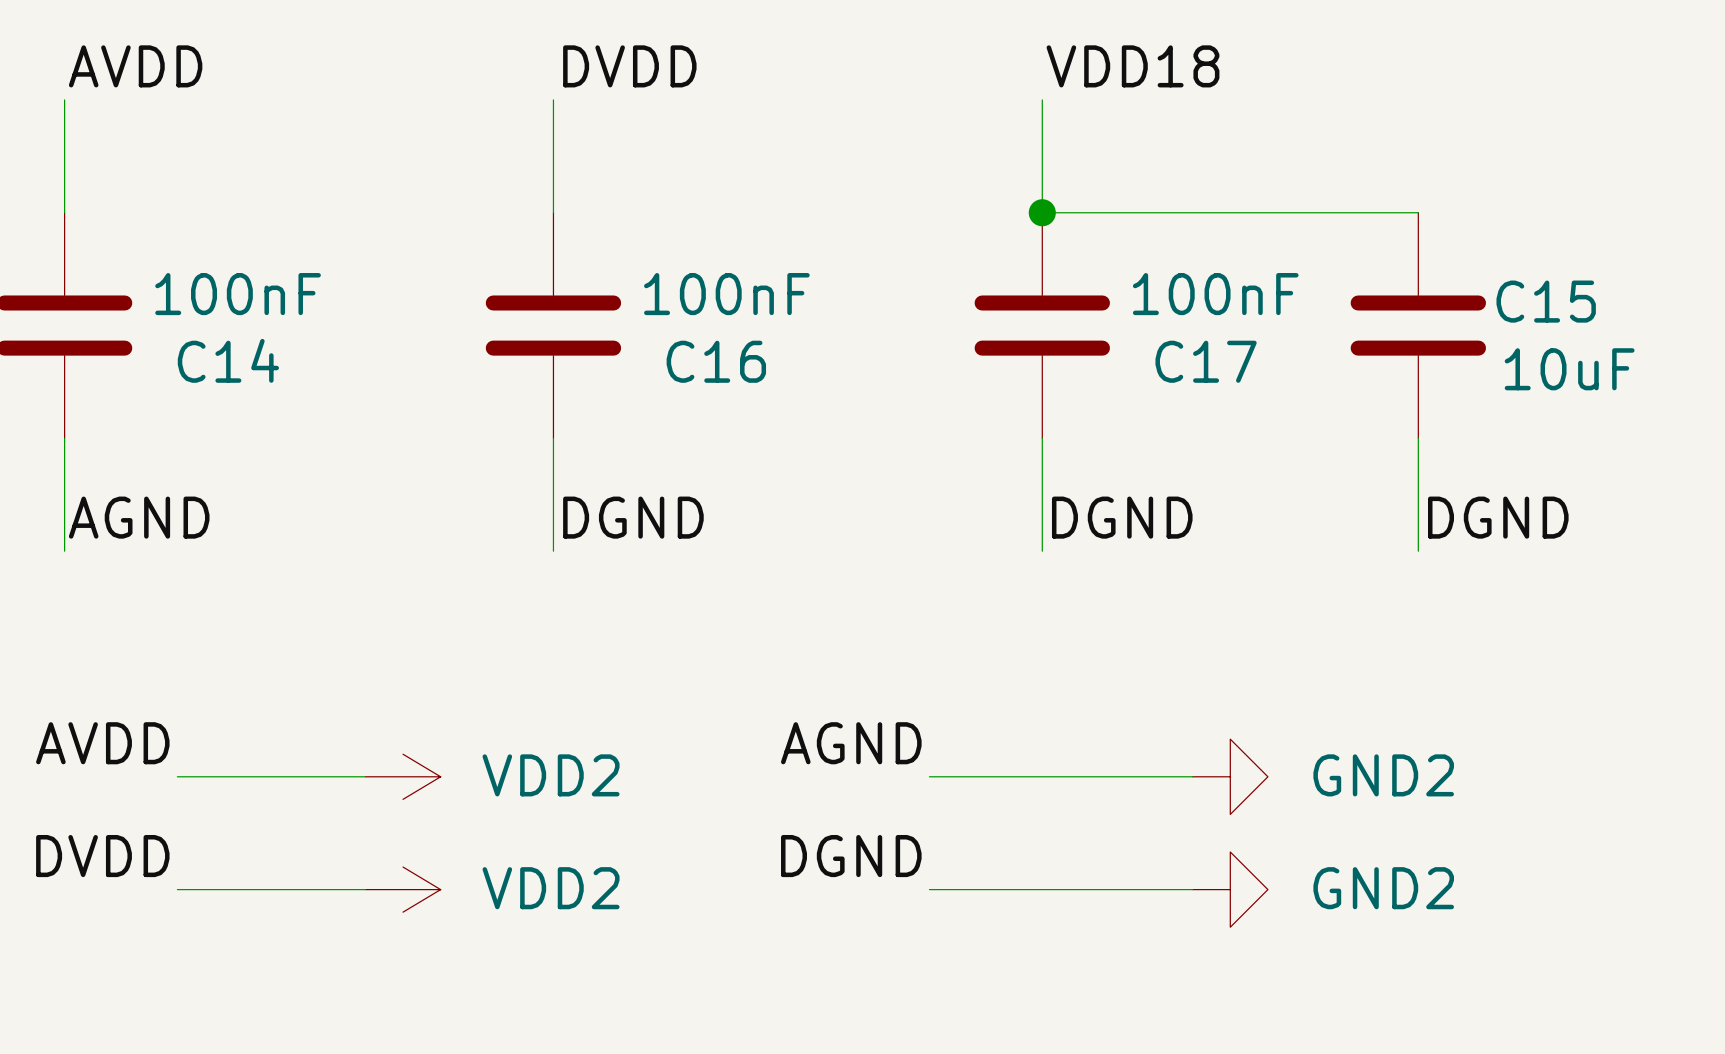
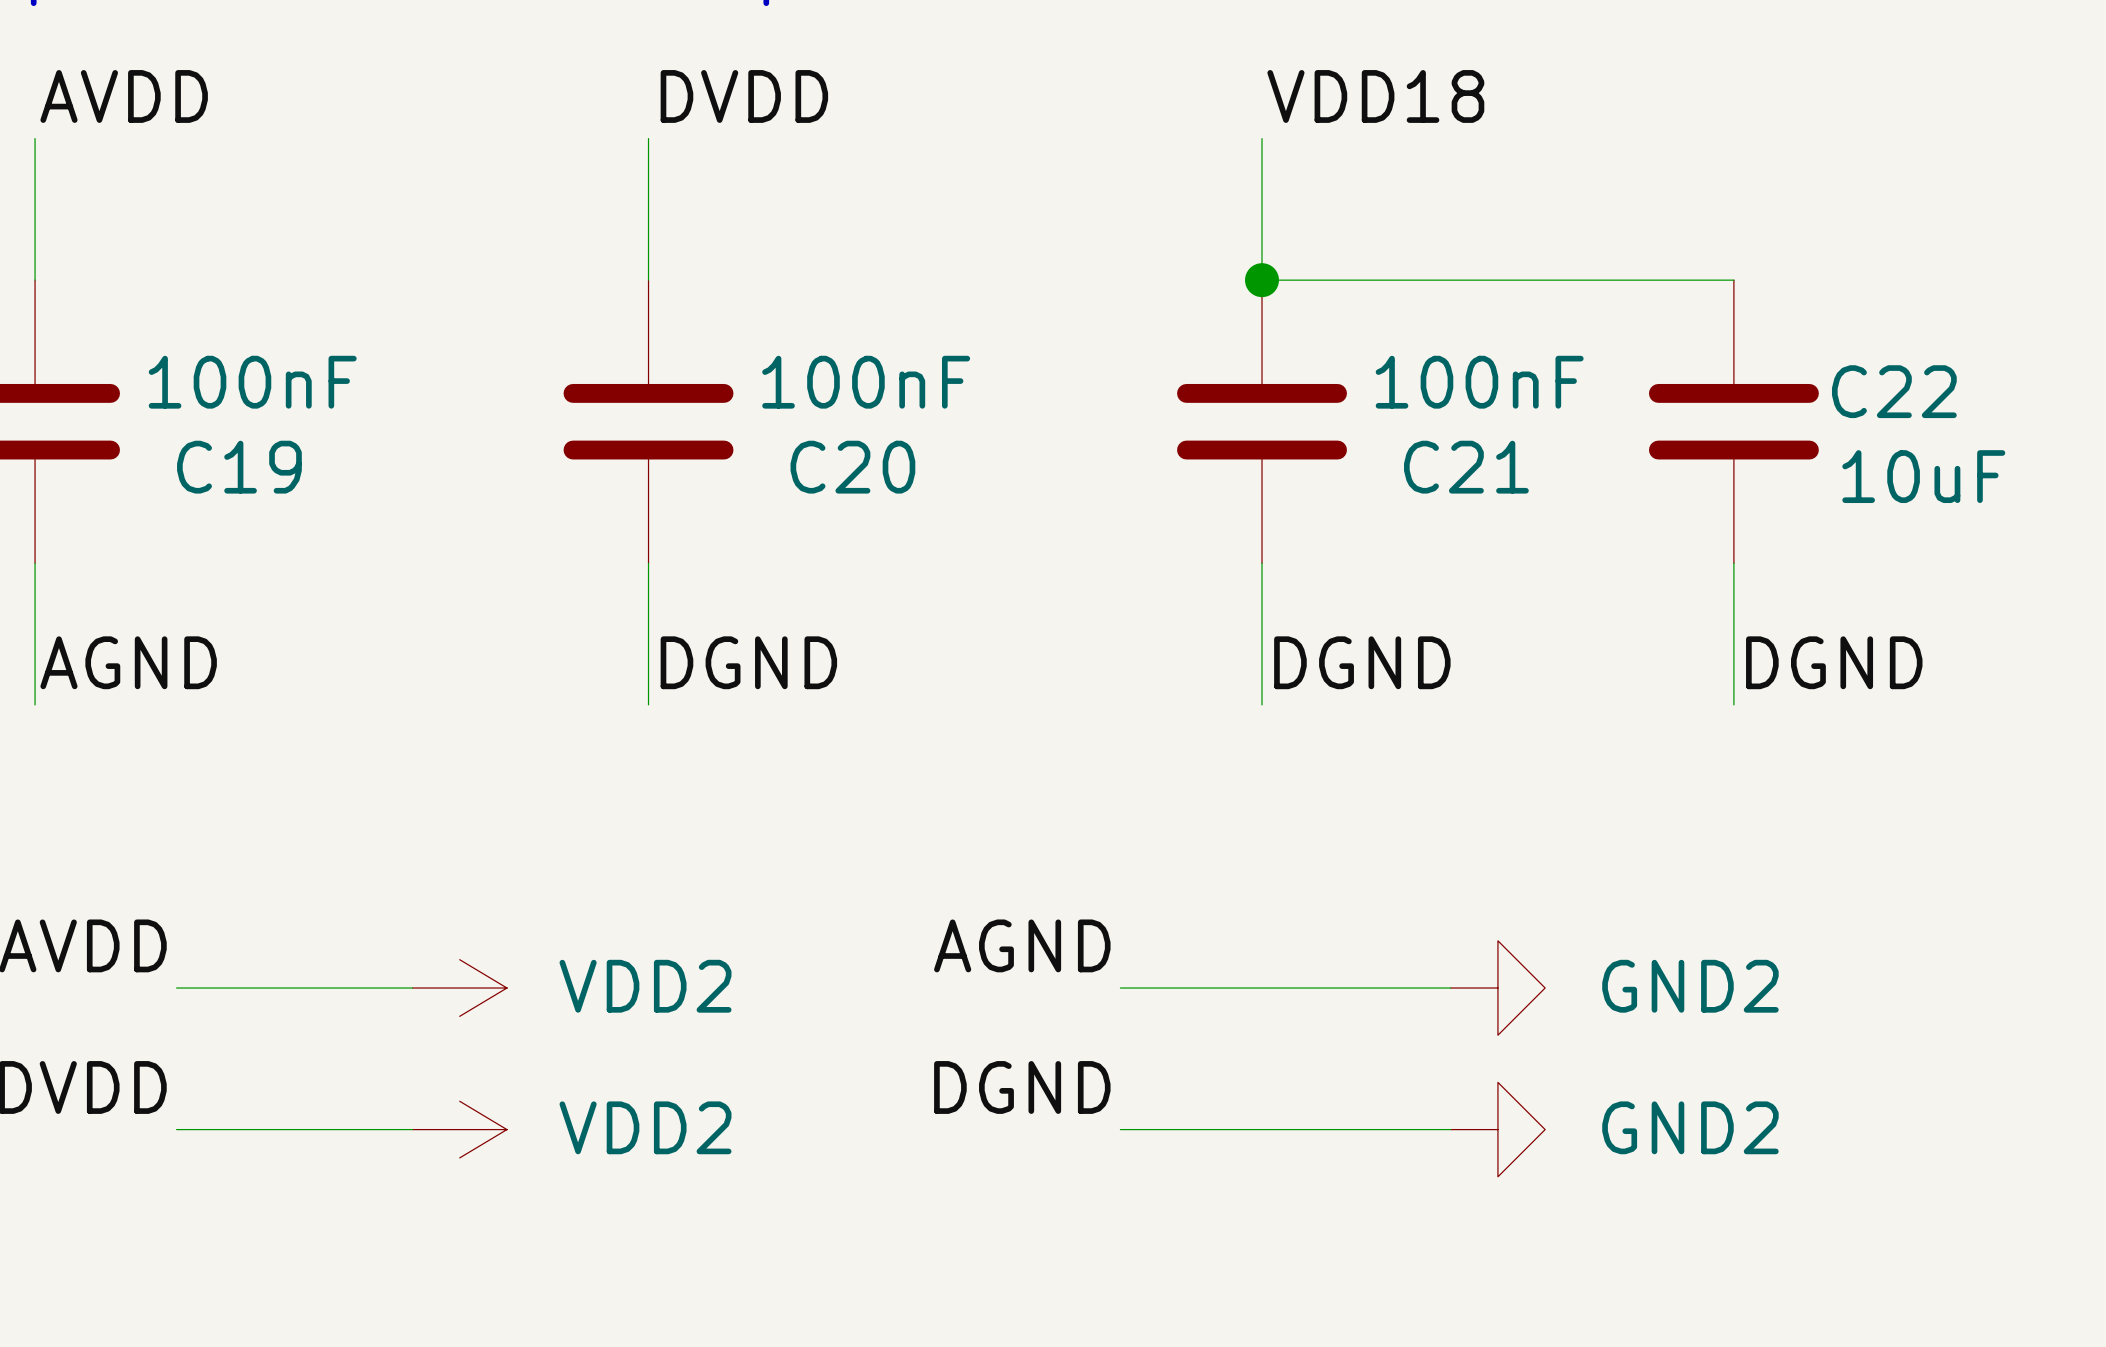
C15 name: C15 (1546, 301) -> C22 (1894, 391)
C14 name: C14 (228, 360) -> C19 (239, 467)
C16 name: C16 (716, 361) -> C20 (852, 467)
C17 name: C17 (1206, 361) -> C21 (1466, 467)

